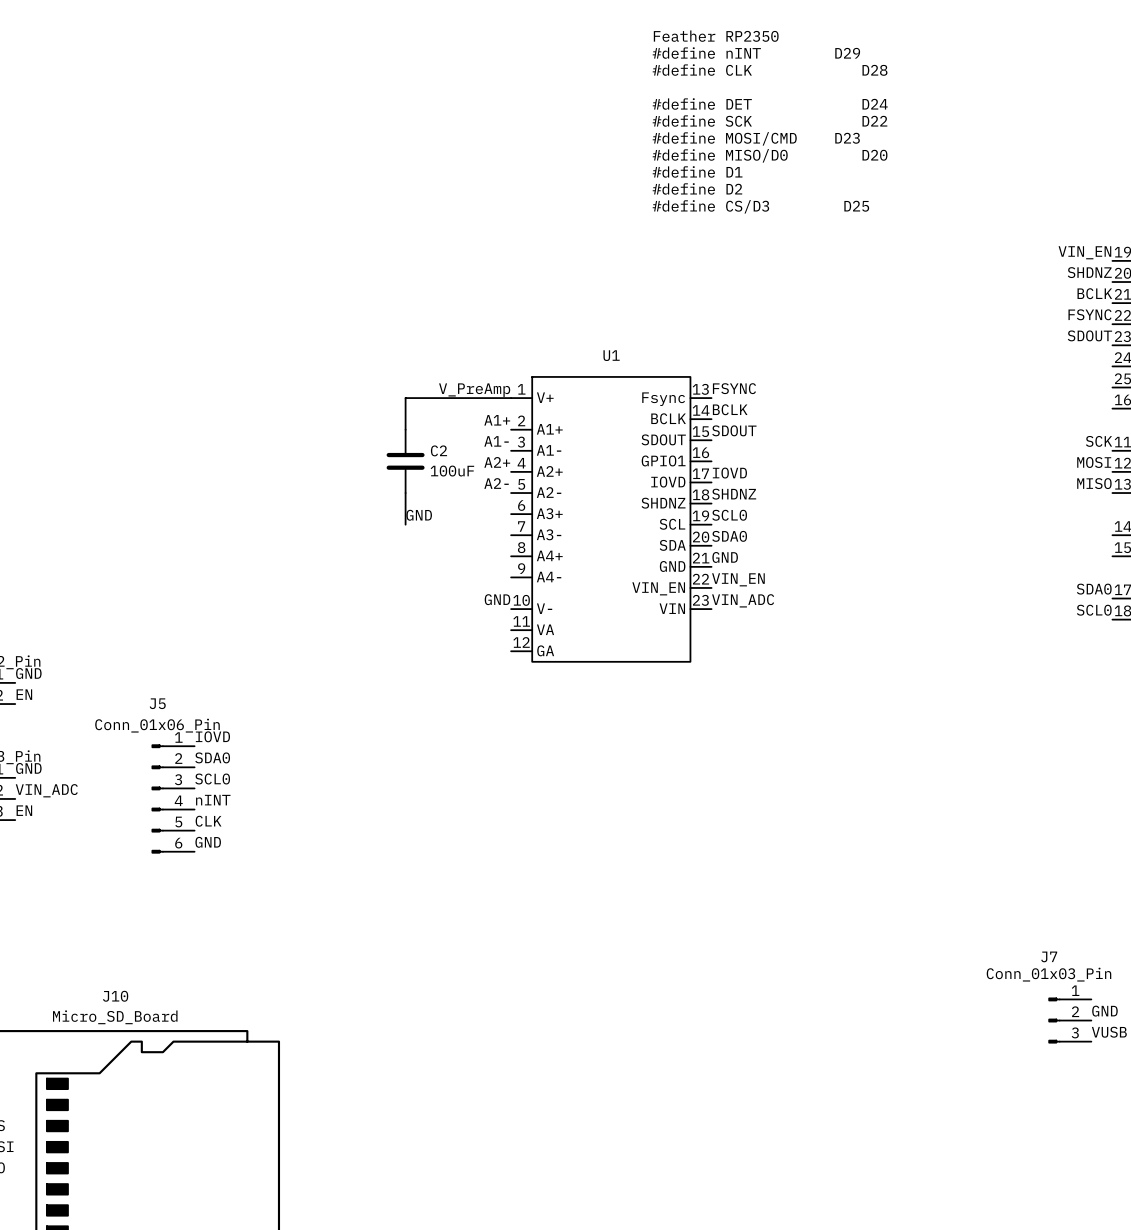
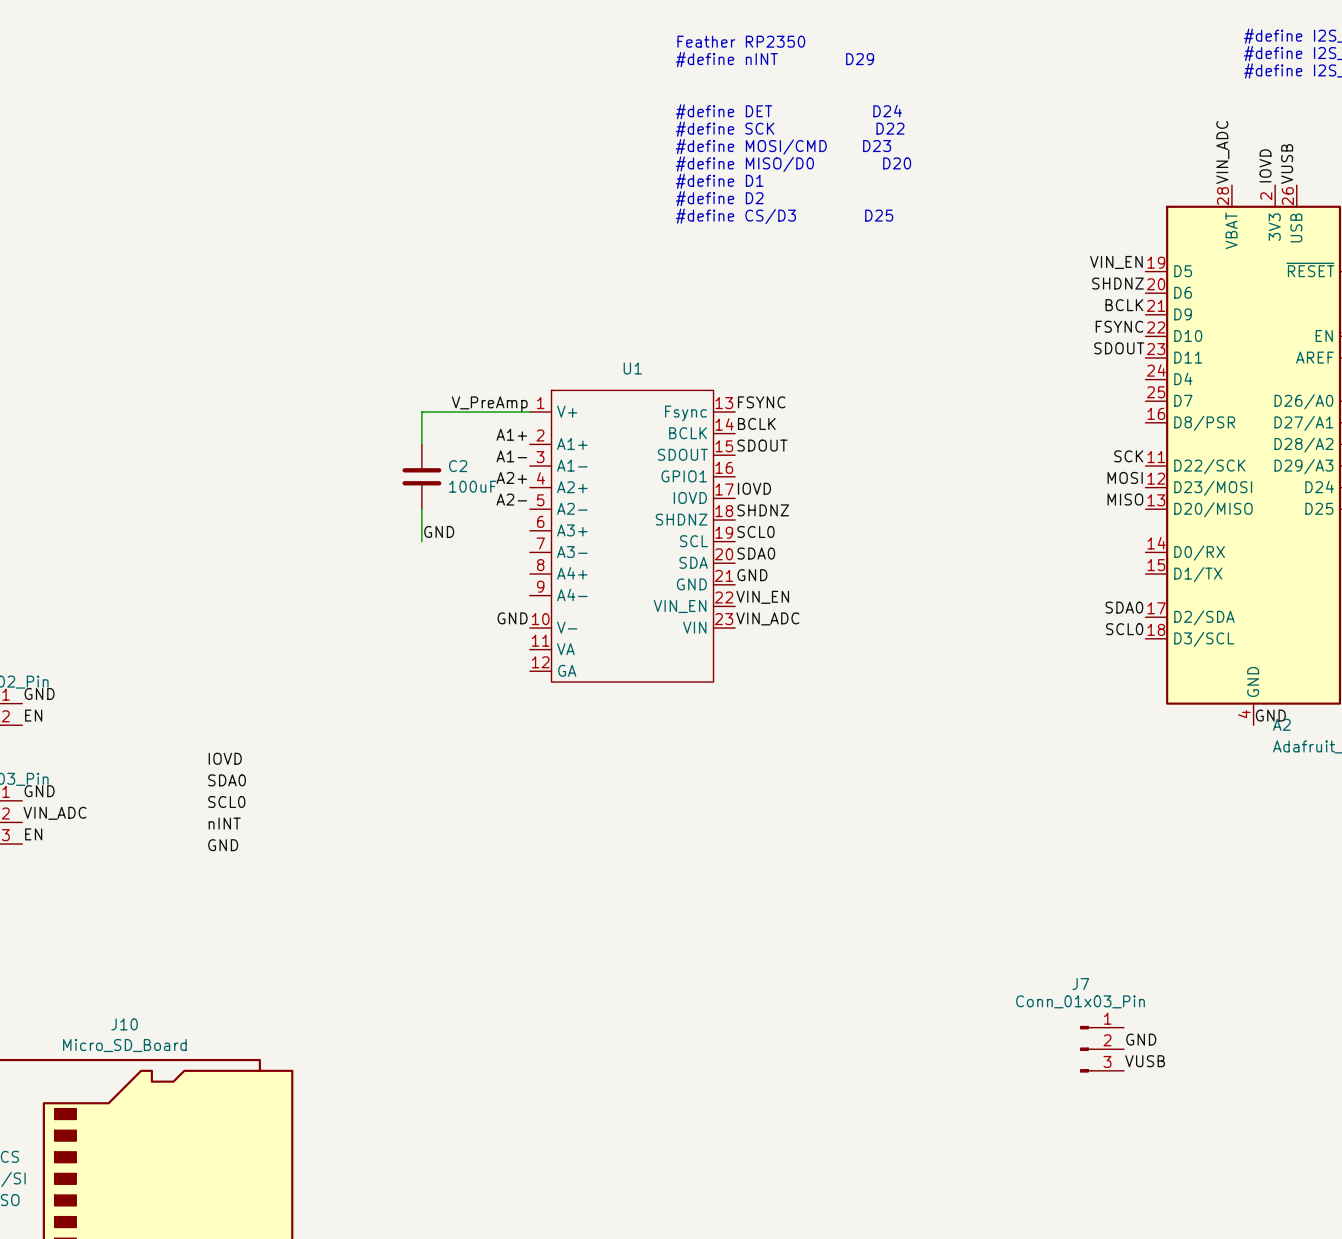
text: #define CLK D28 (770, 70) -> none
J5: Conn_01x06_Pin (173, 798) -> none
label: CLK (208, 821) -> GND (223, 845)
label: GND (208, 842) -> none

